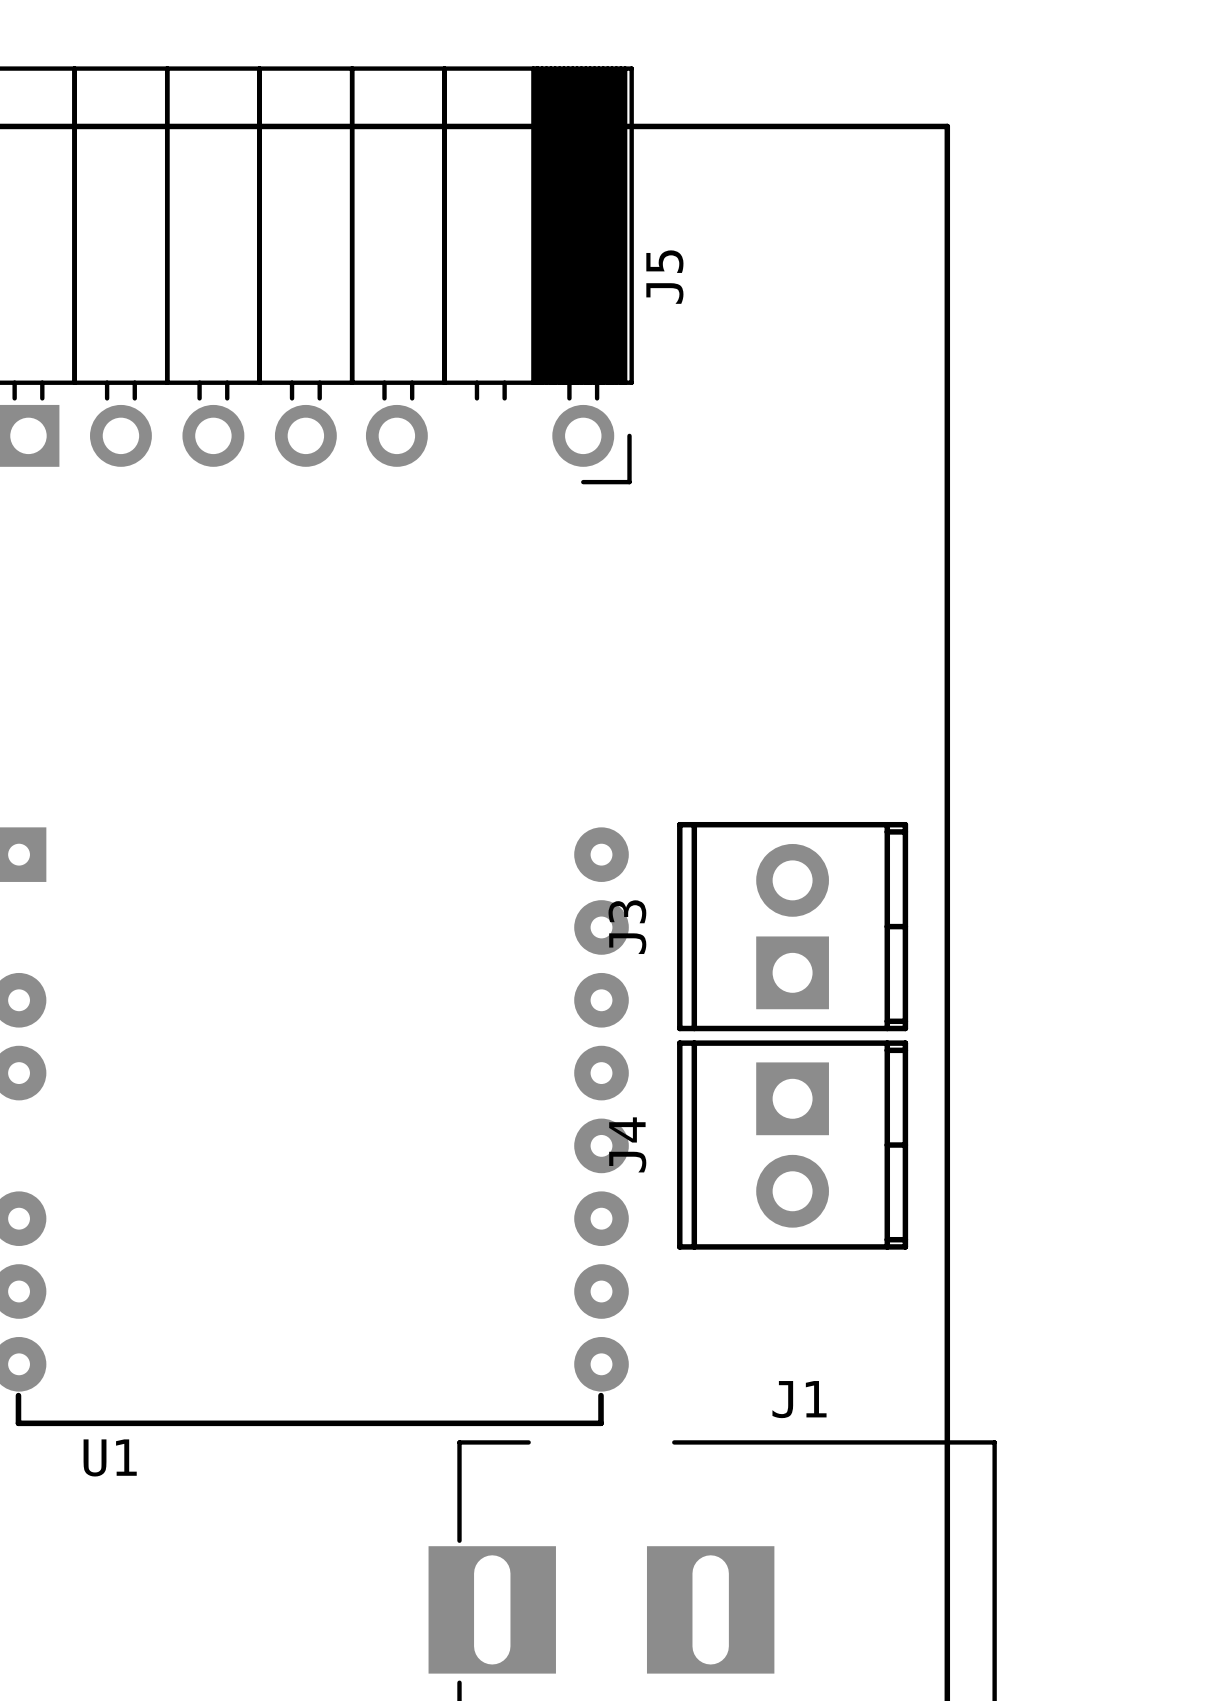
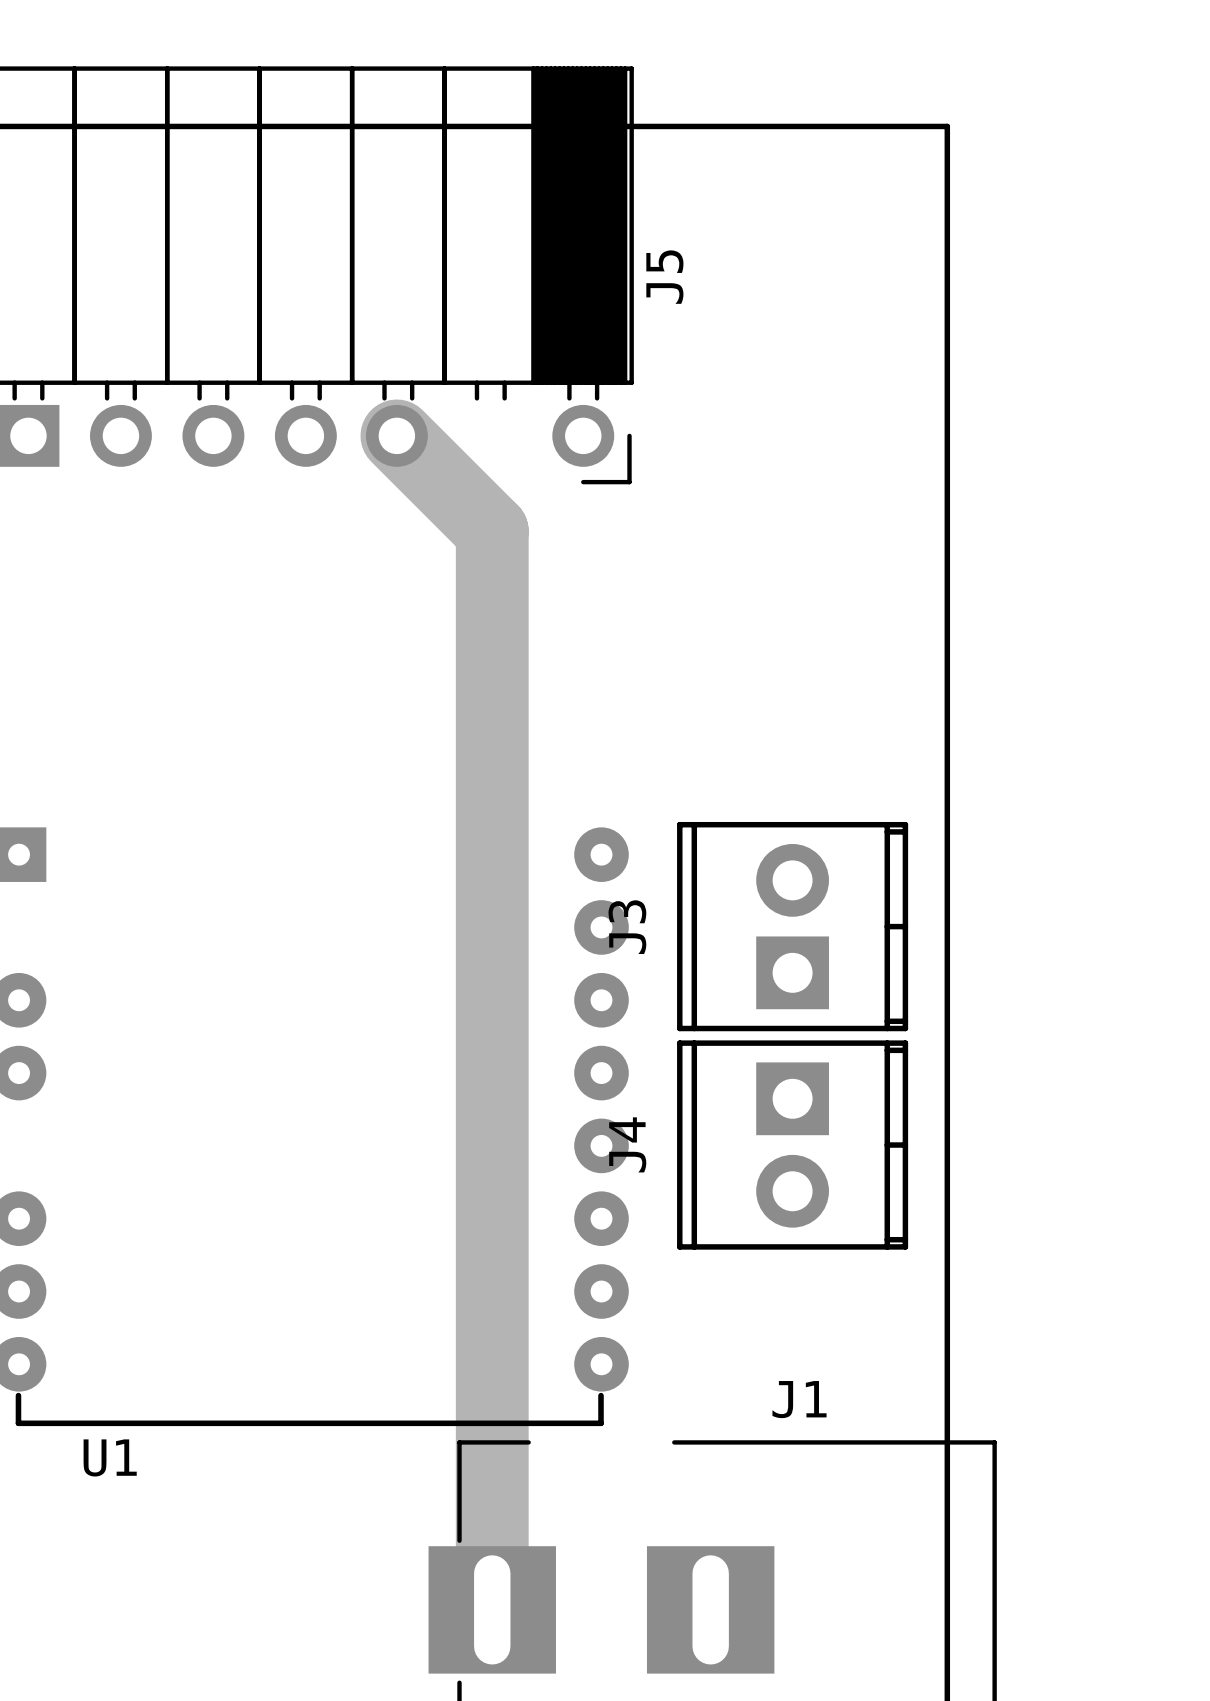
track: none -> (396, 435) (492, 531) (492, 1609)

